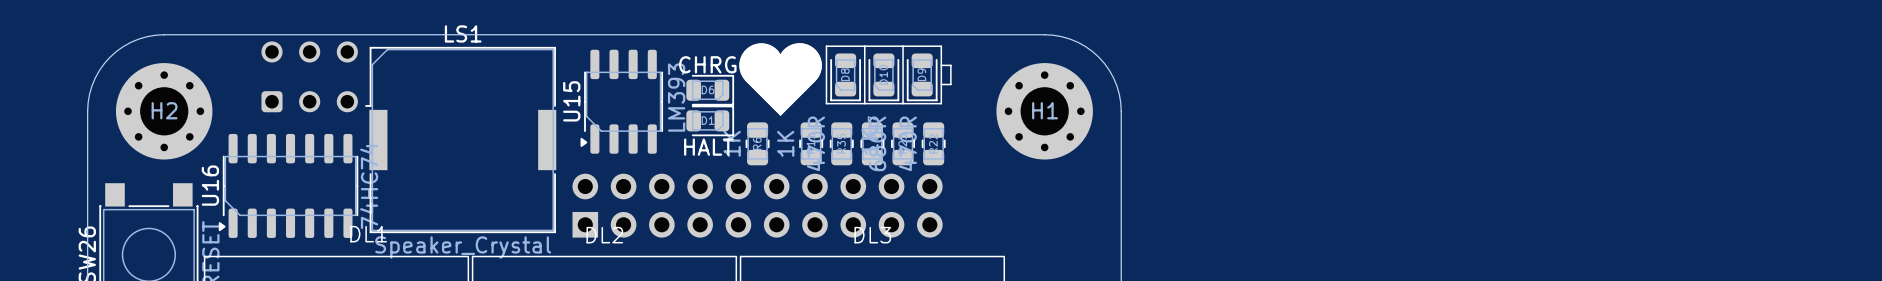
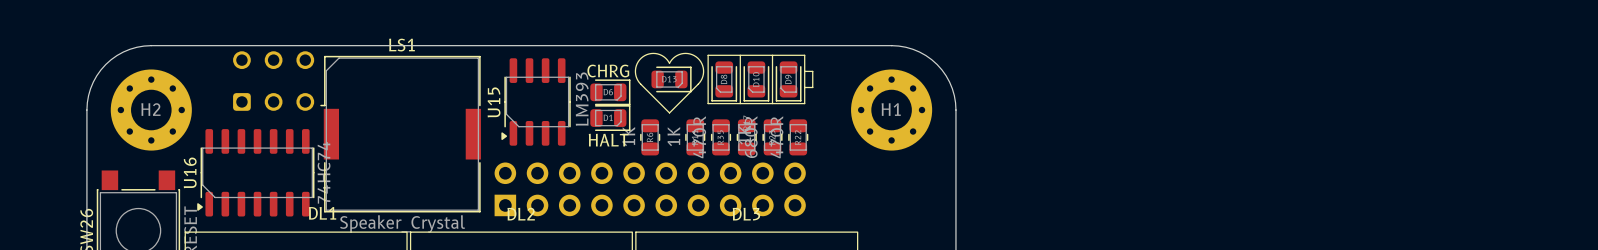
drawing: [739, 43, 822, 116] -> none

